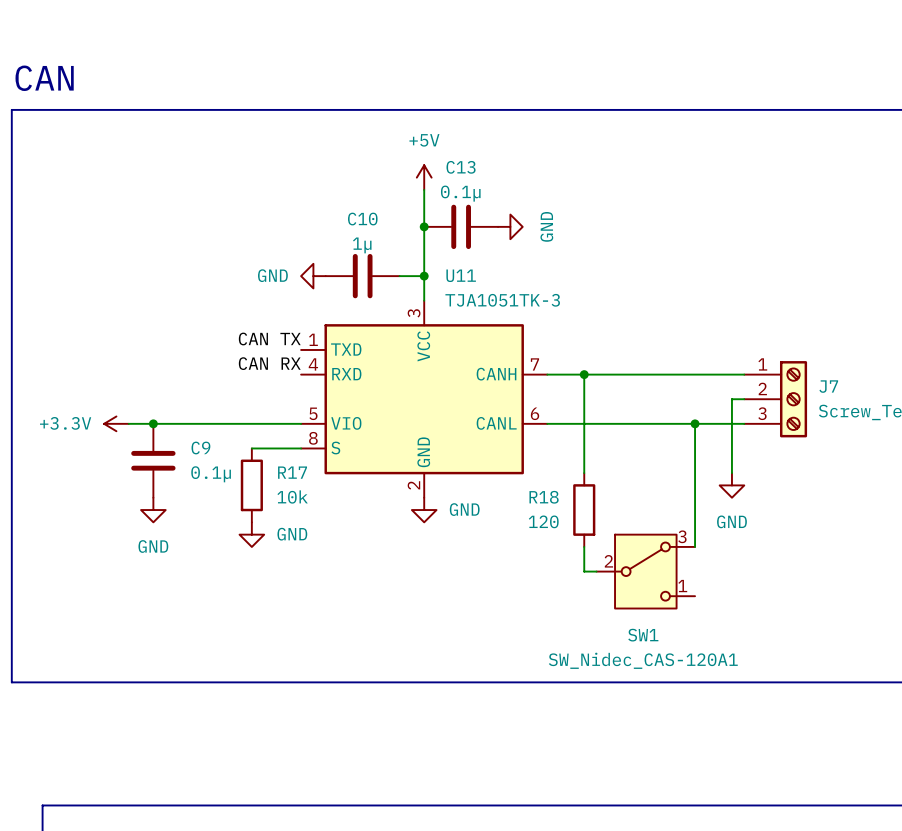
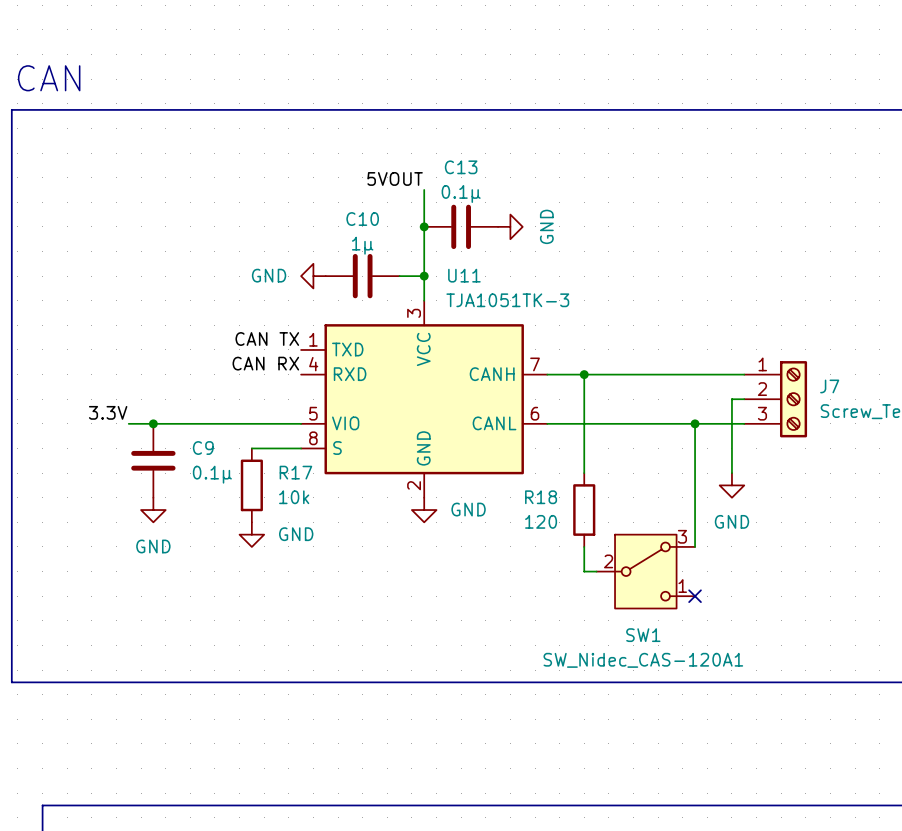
power symbol: +5V (424, 177) -> none
label: none -> 5VOUT (395, 178)
label: none -> 3.3V (108, 412)
power symbol: +3.3V (116, 423) -> none
no-connect mark: none -> (695, 596)

